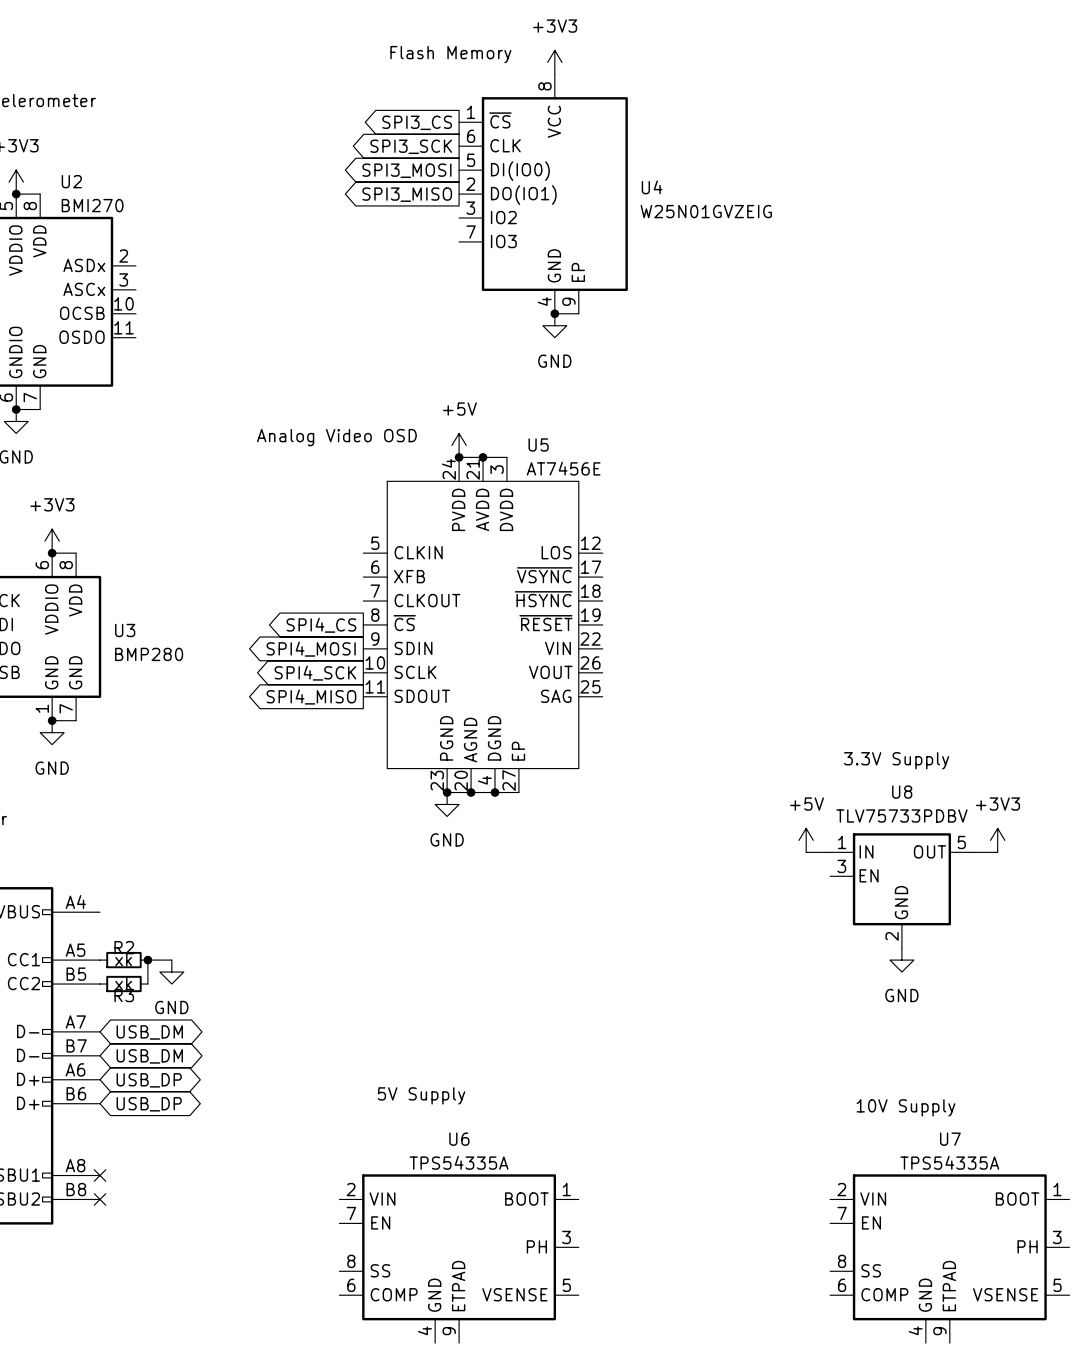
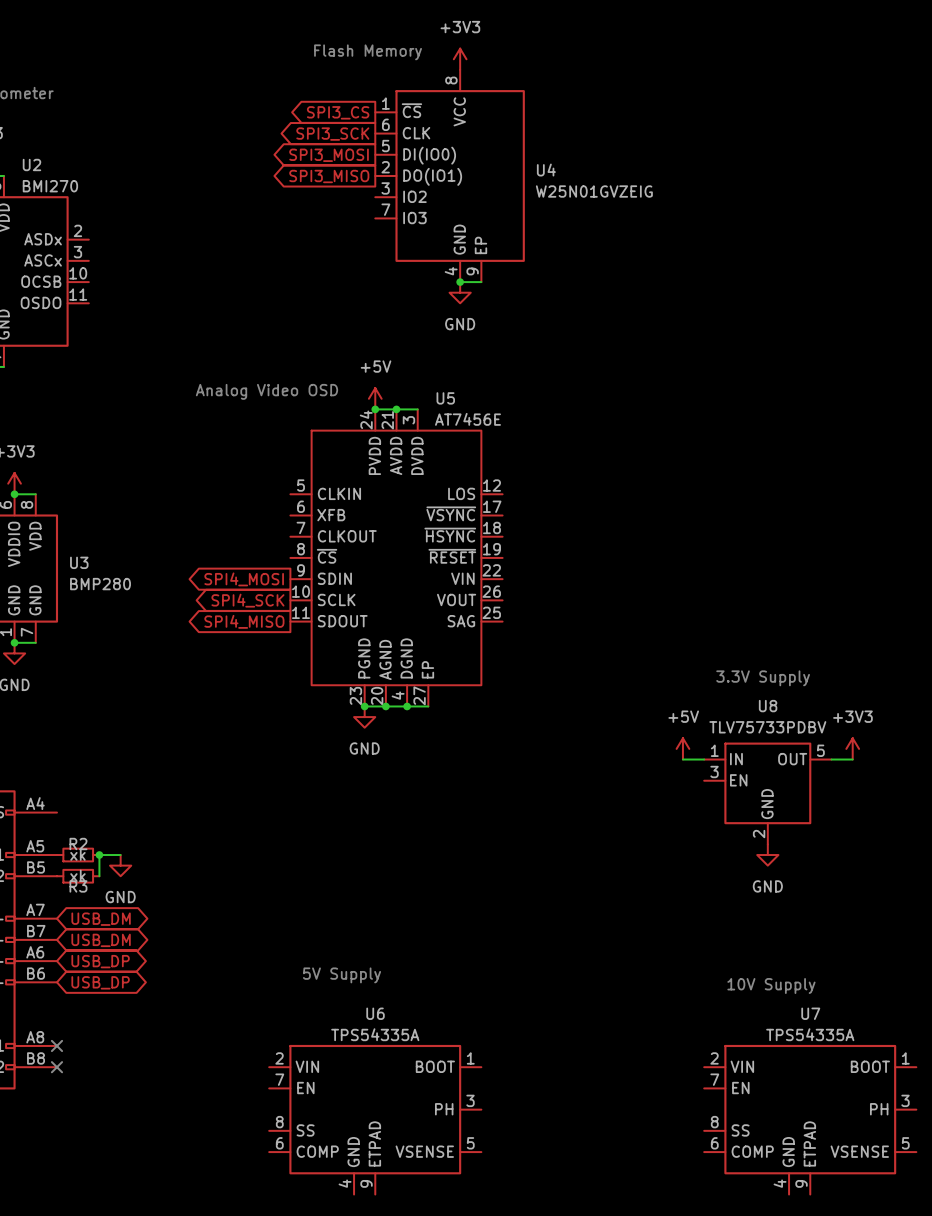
global label: SPI4_CS (321, 625) -> none

